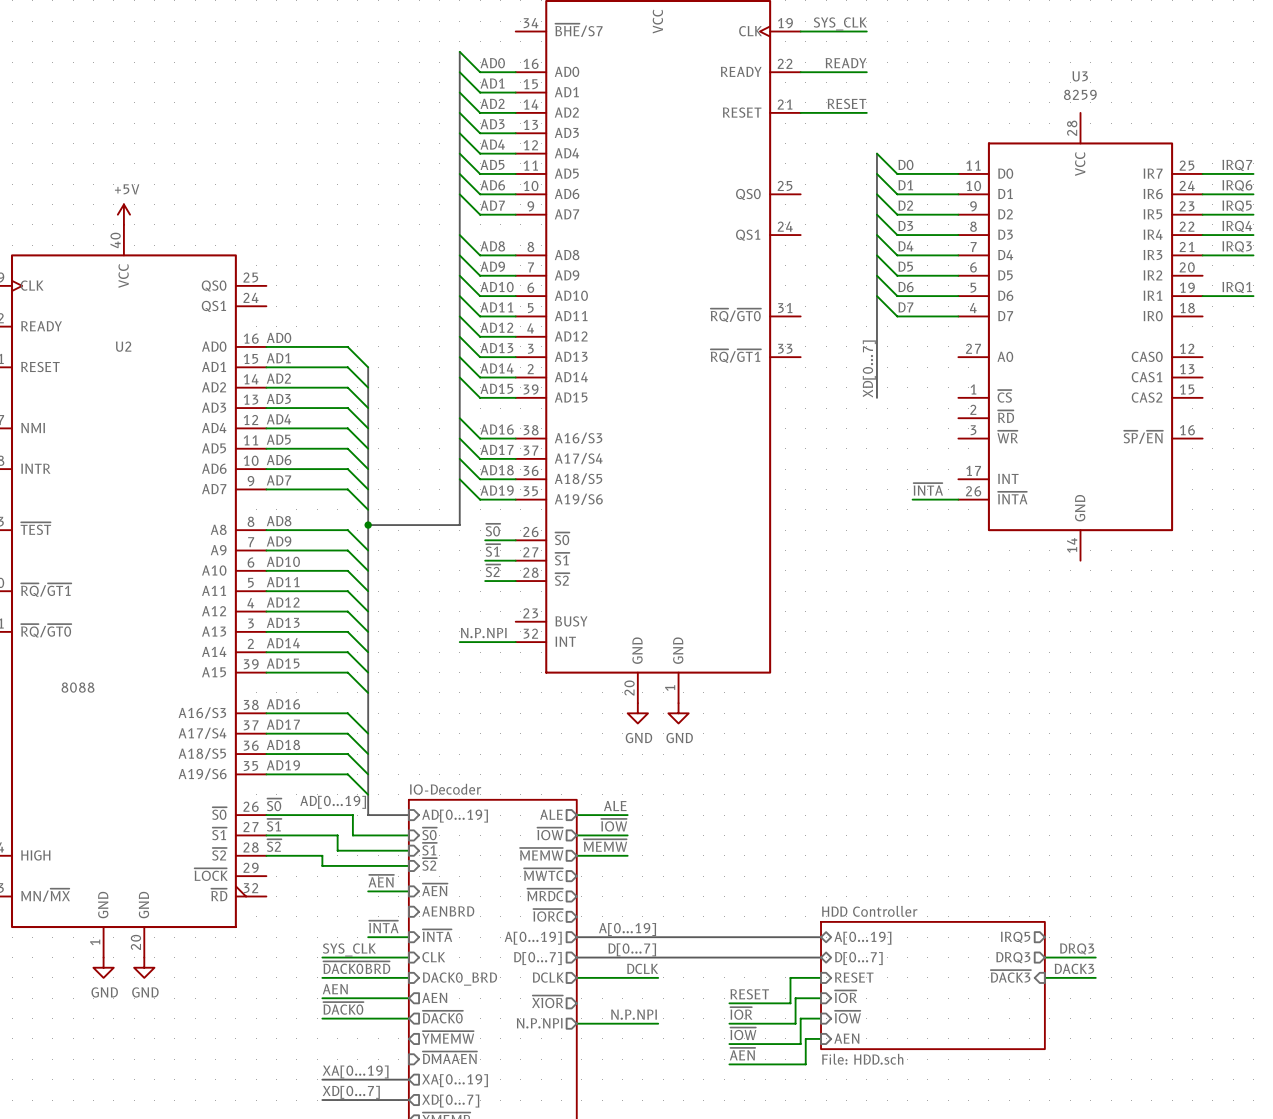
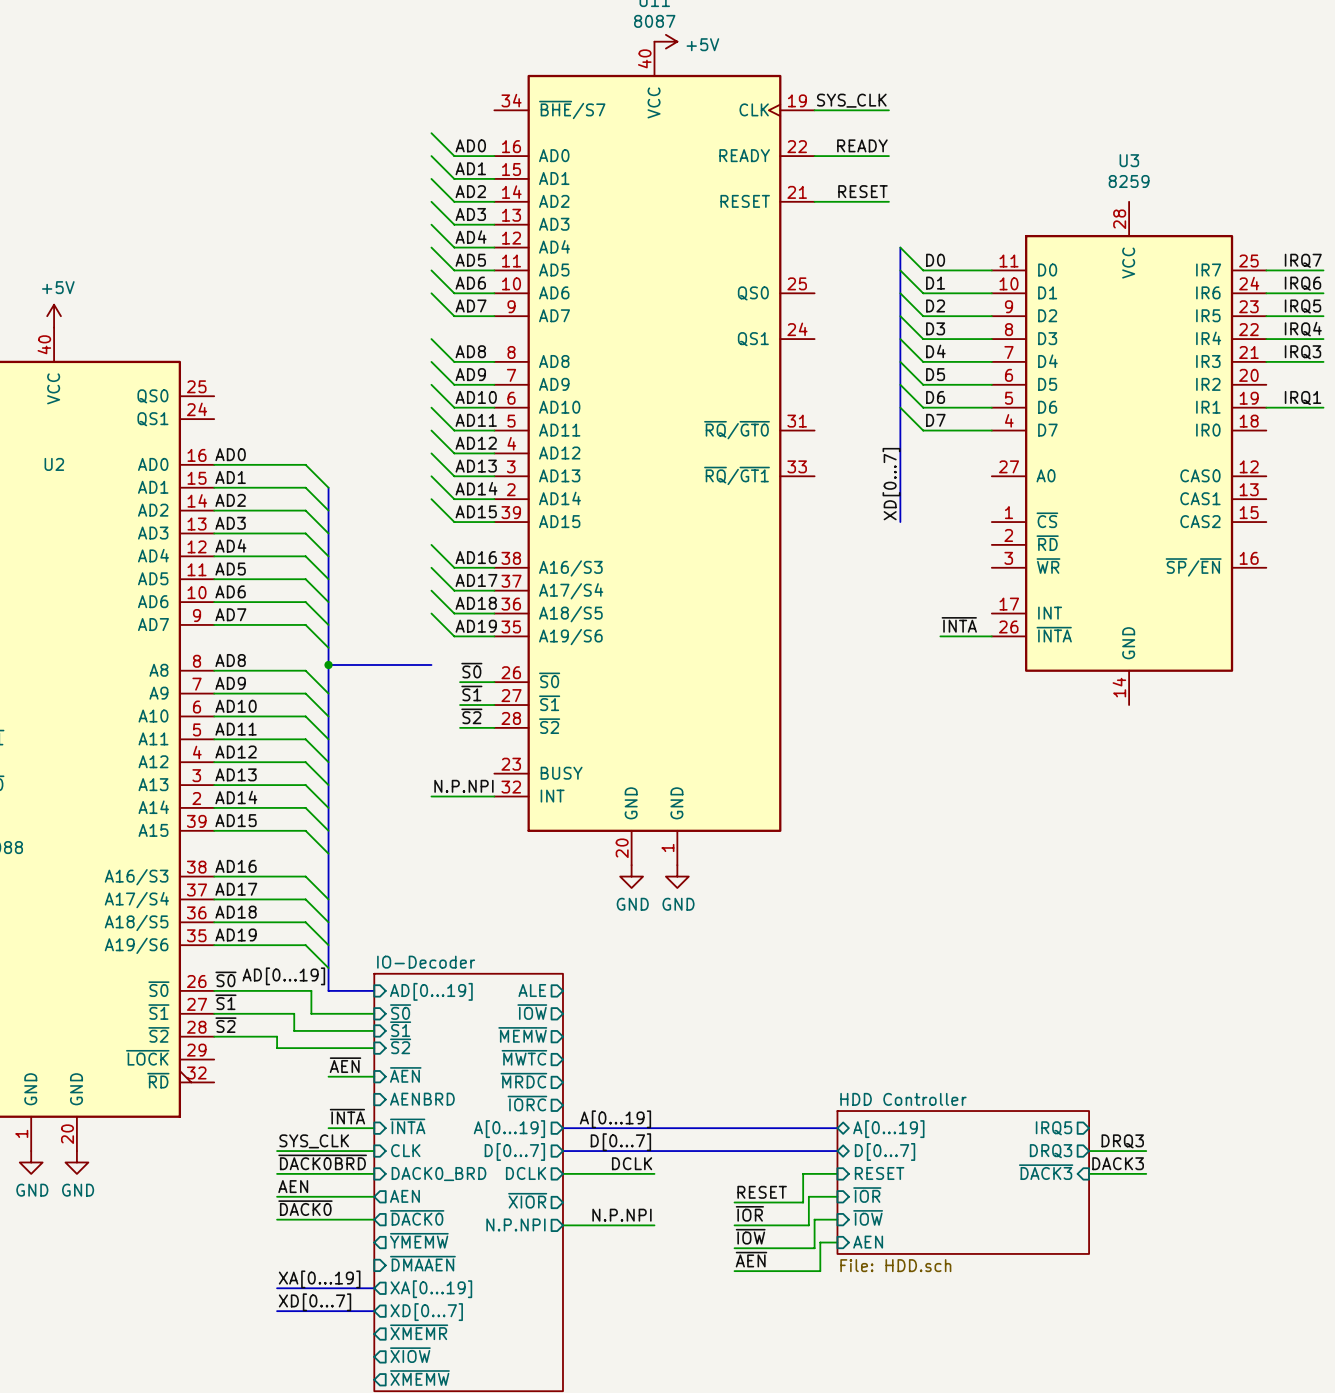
bus: (459, 51) (459, 525) -> none
label: ALE (615, 806) -> none
wire: (576, 815) (627, 815) -> none
label: ~{IOW} (614, 825) -> none
wire: (576, 835) (627, 835) -> none
label: ~{MEMW} (605, 845) -> none
wire: (576, 855) (627, 855) -> none

